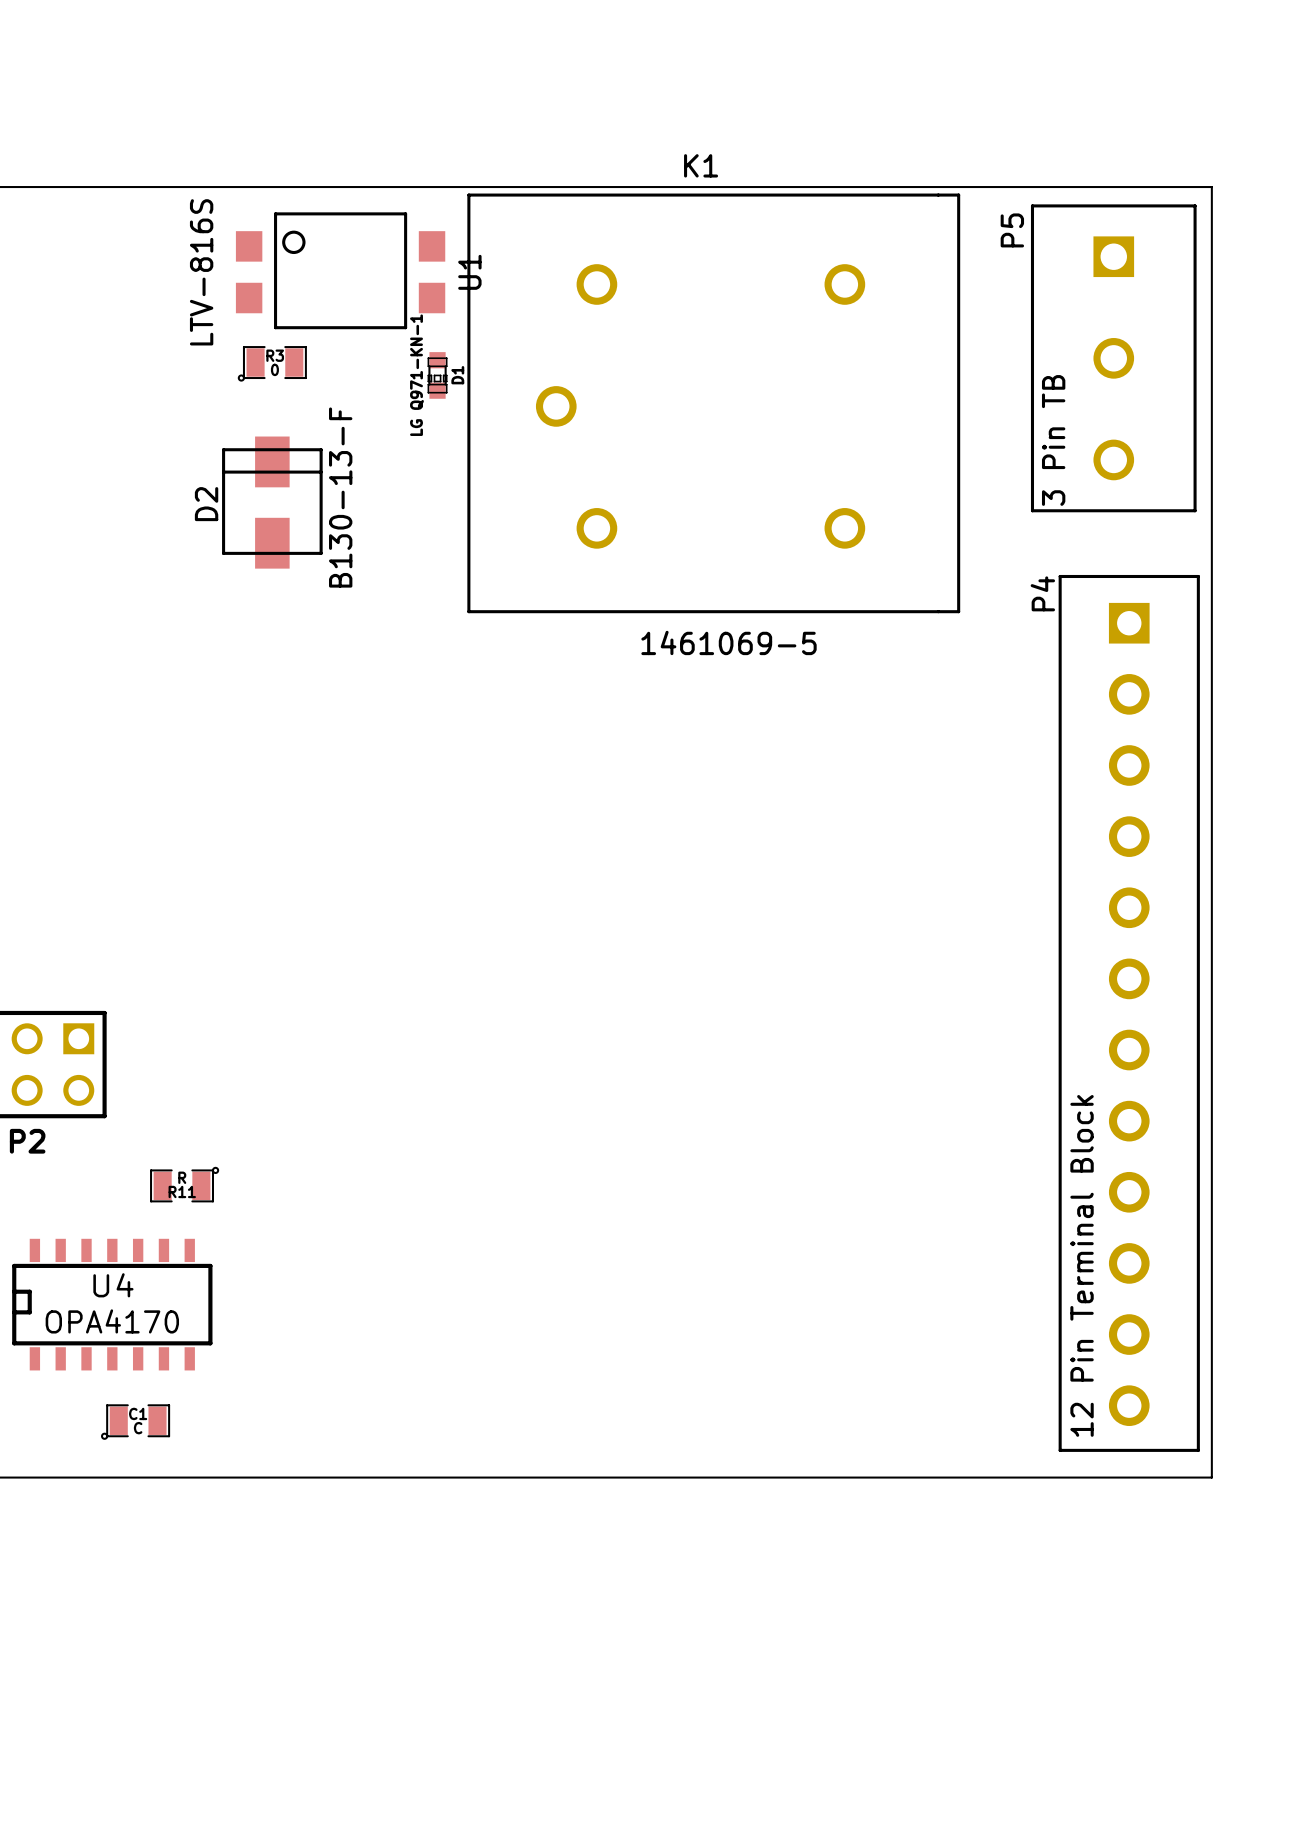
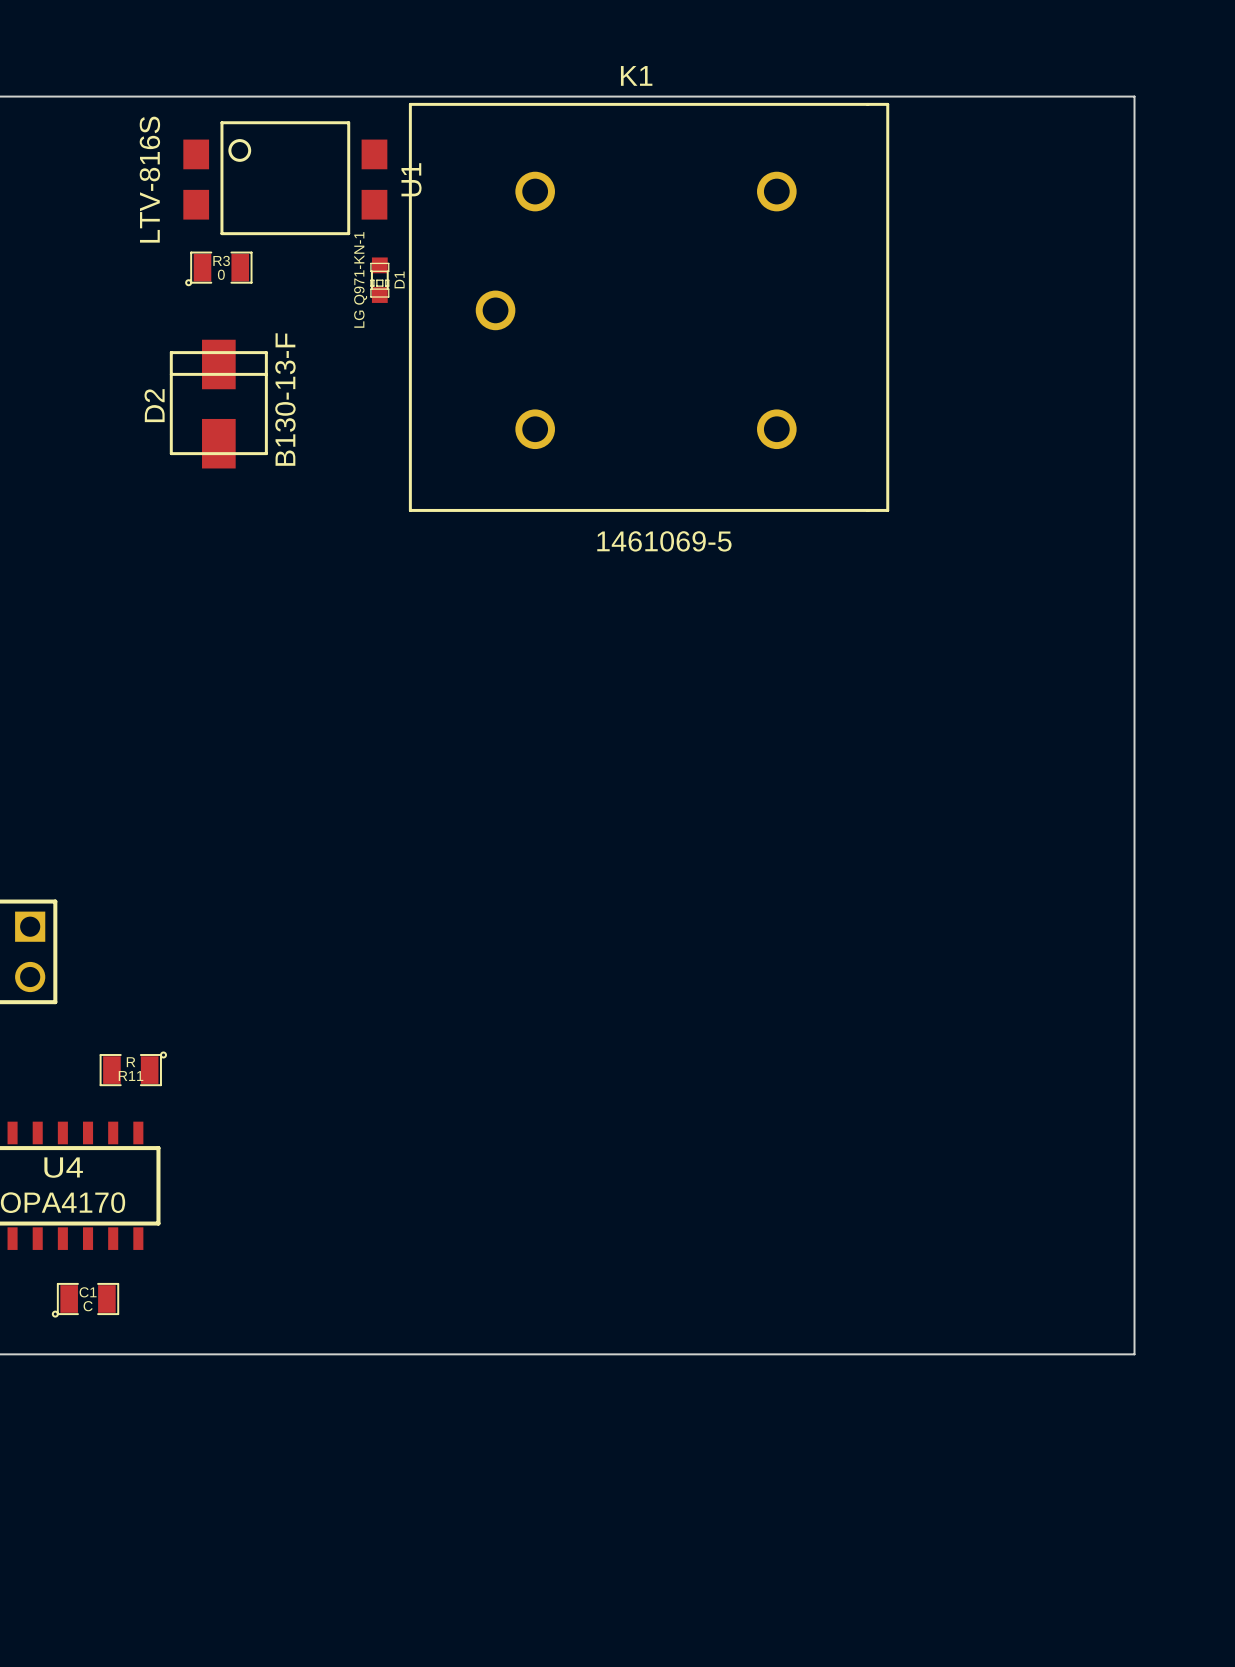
P5: 3 Pin TB (1113, 358) -> none
P4: 12 Pin Terminal Block (1129, 1013) -> none

